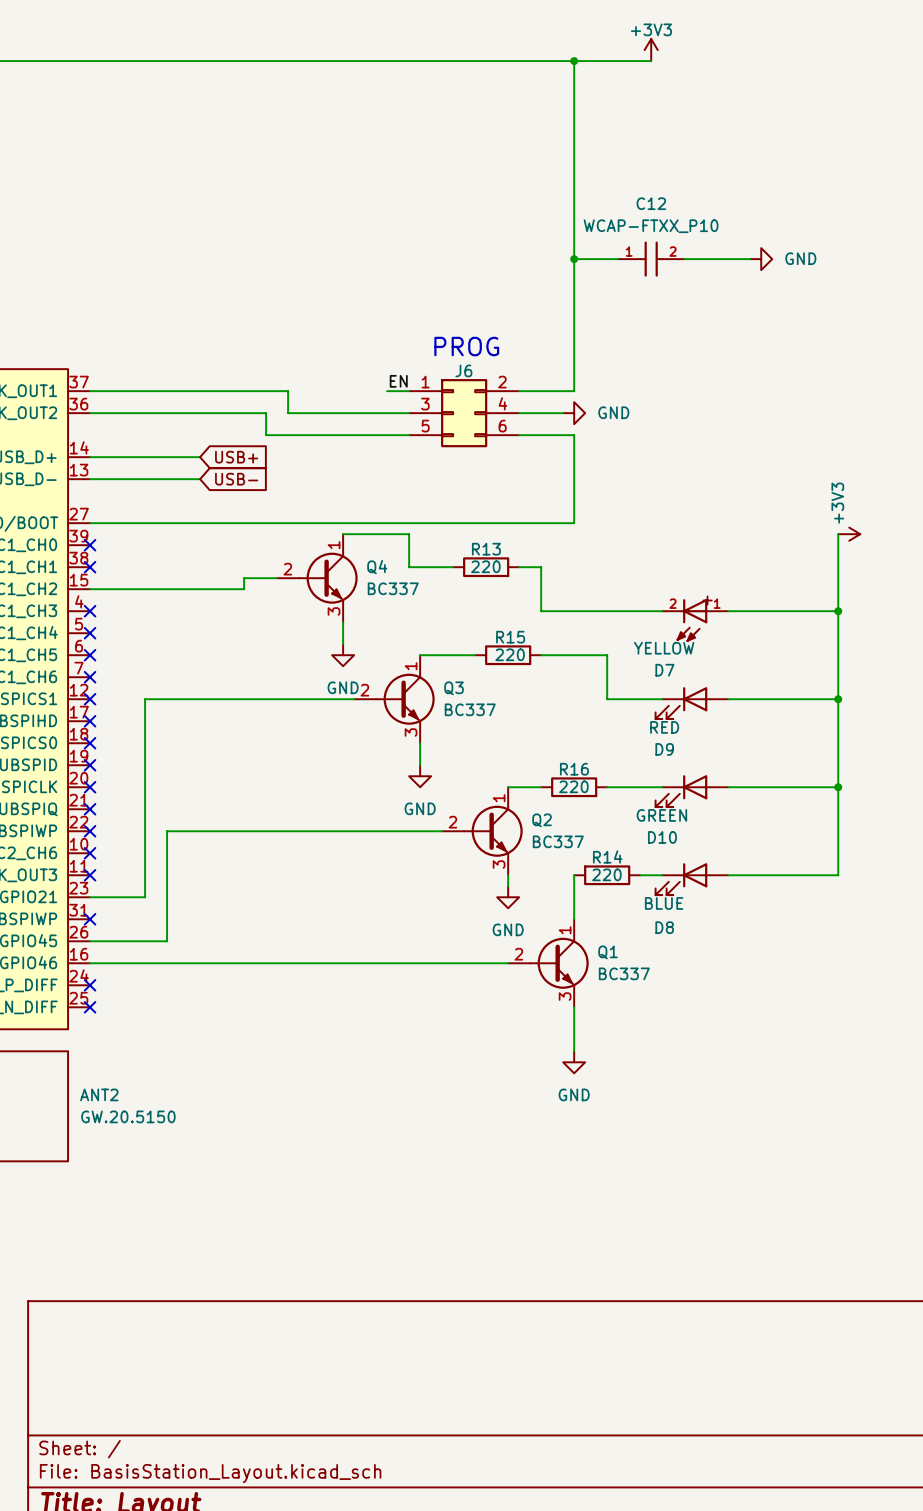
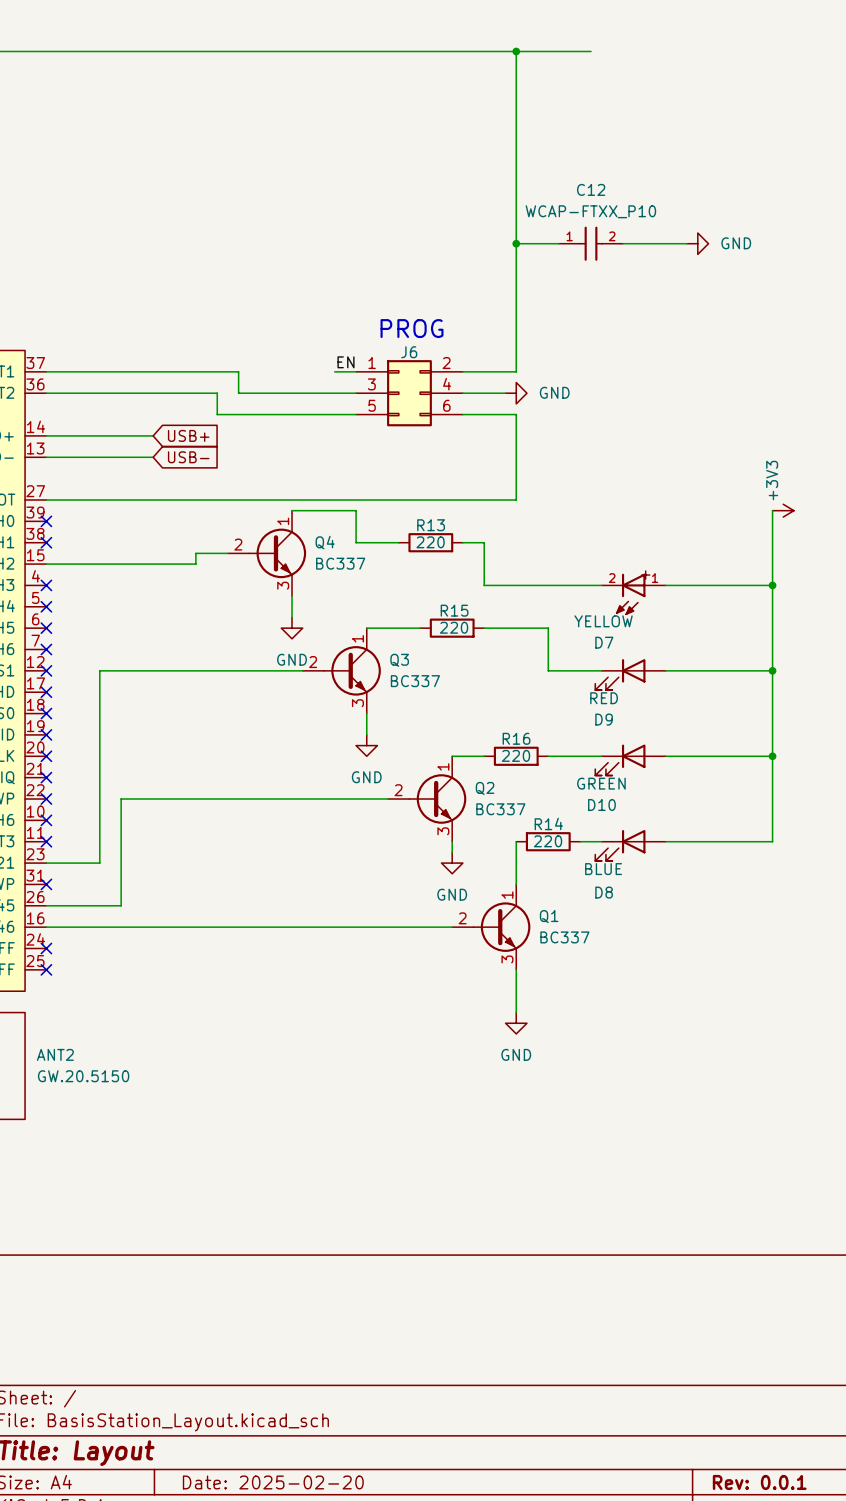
power symbol: +3V3 (651, 50) -> none

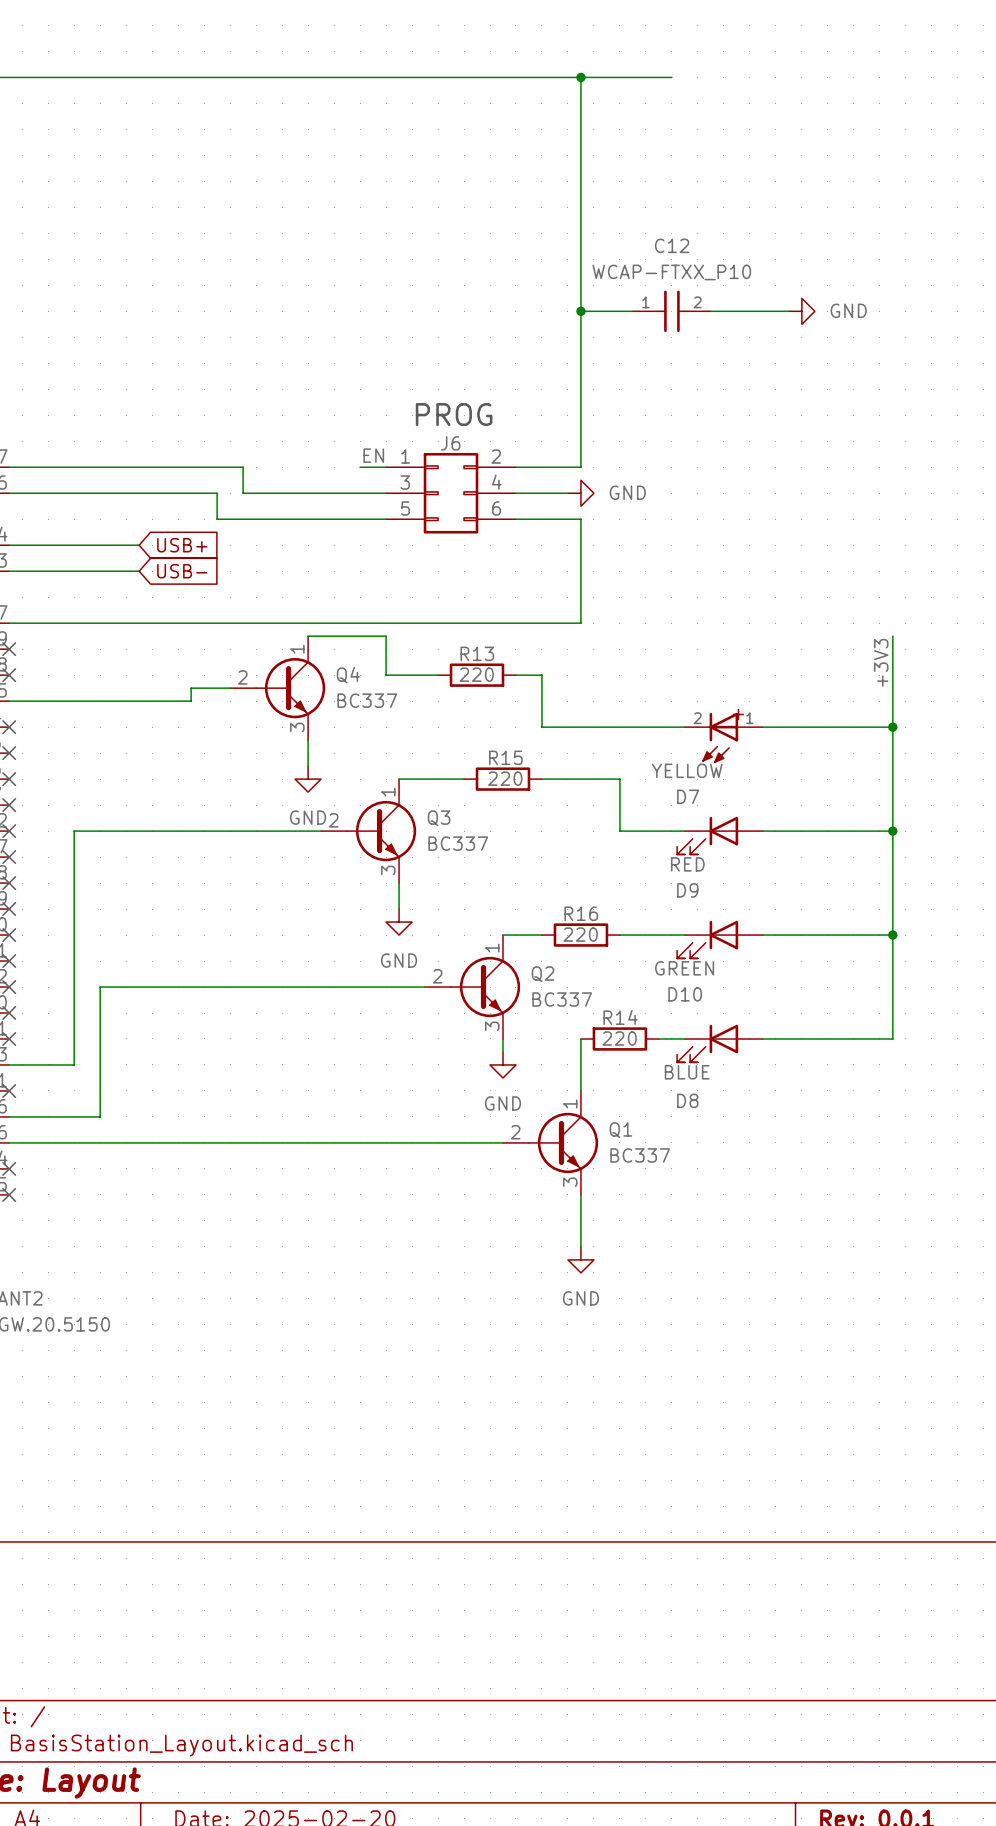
power symbol: +3V3 (783, 510) -> none
label: none -> +3V3 (881, 662)

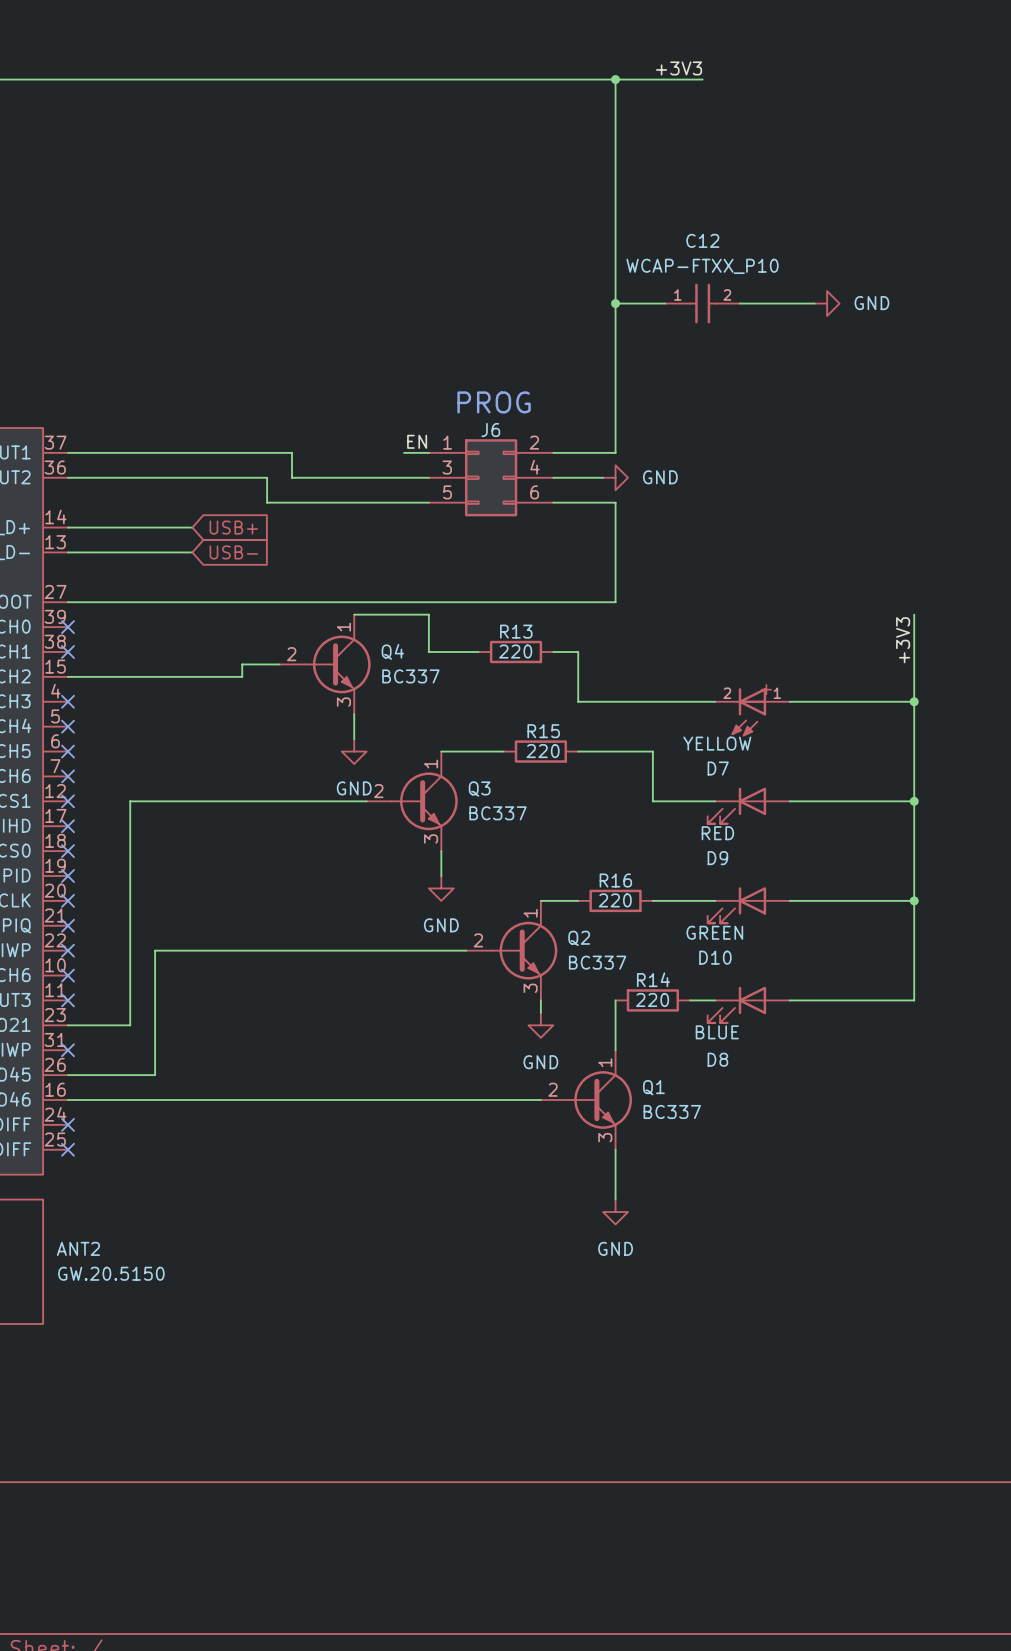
label: none -> +3V3 (679, 68)

